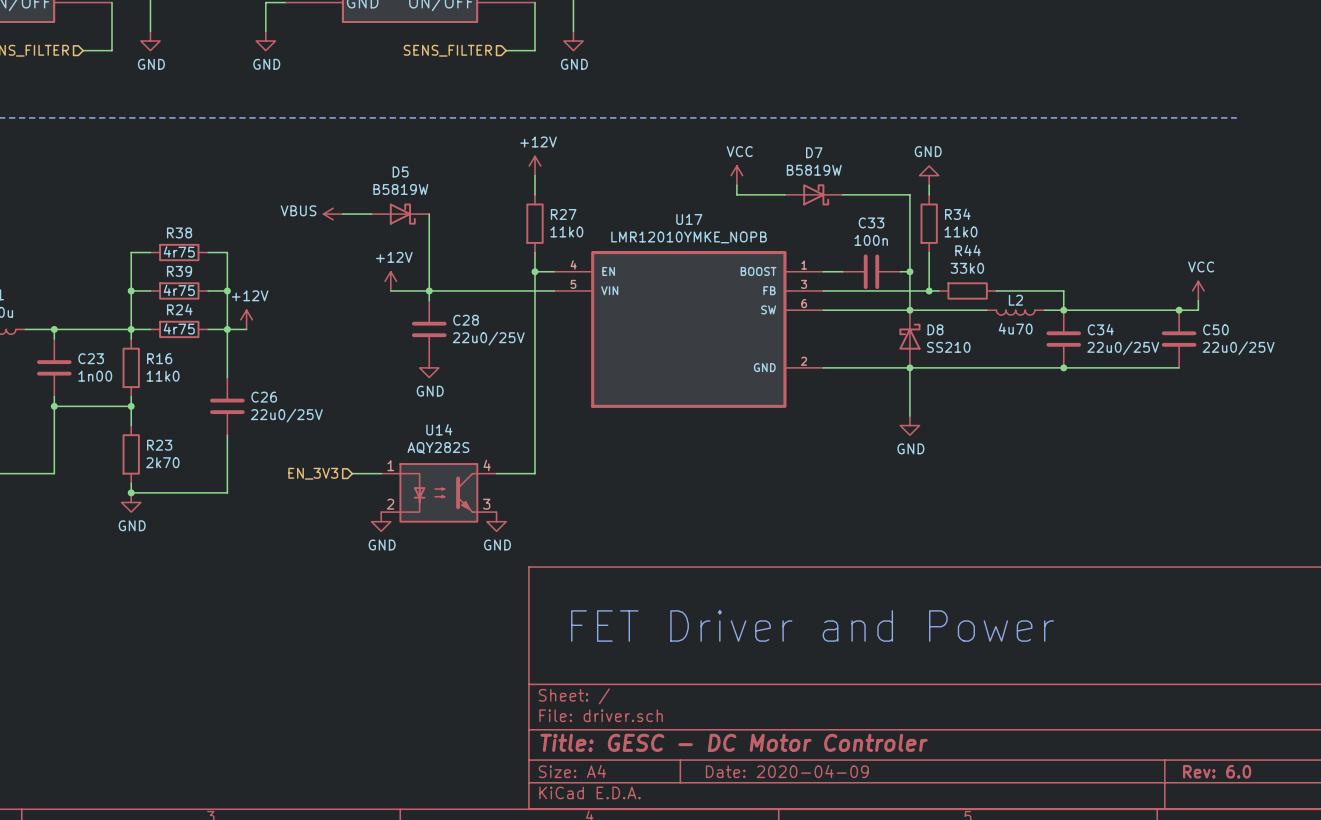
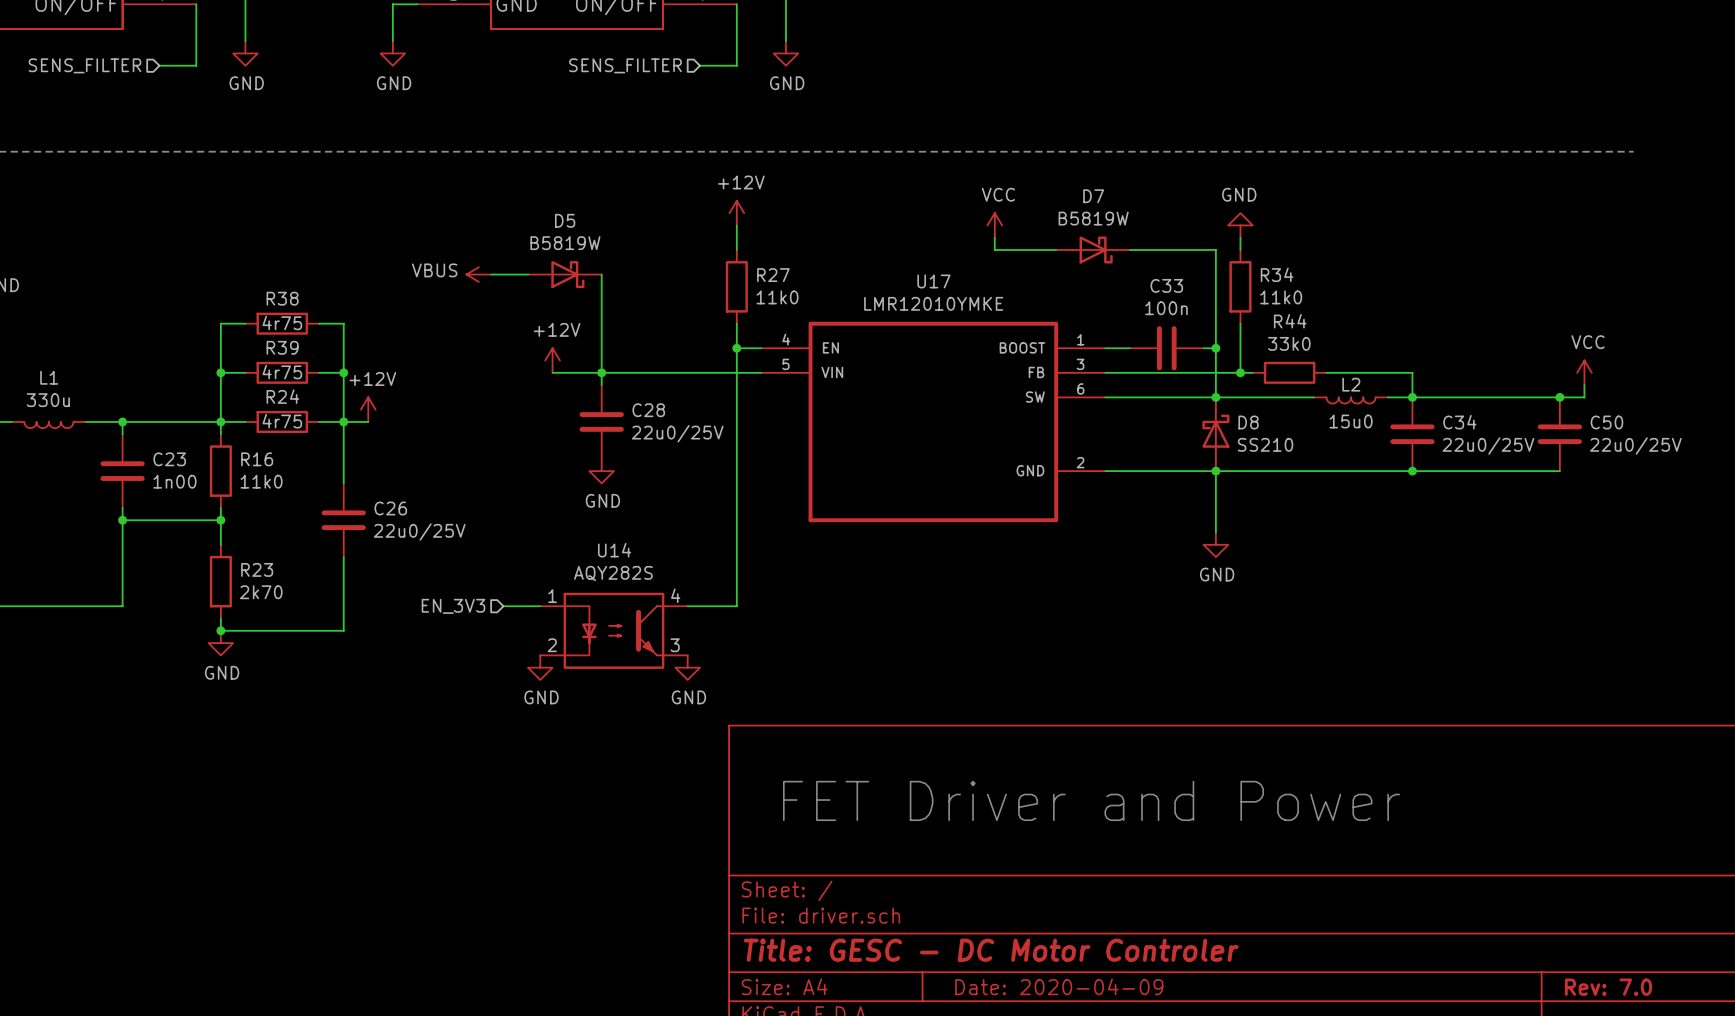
U17 value: LMR12010YMKE_NOPB (689, 237) -> LMR12010YMKE (933, 303)
L2 value: 4u70 (1015, 328) -> 15u0 (1351, 421)
title block: Rev: 6.0 (1217, 771) -> Rev: 7.0 (1608, 987)

